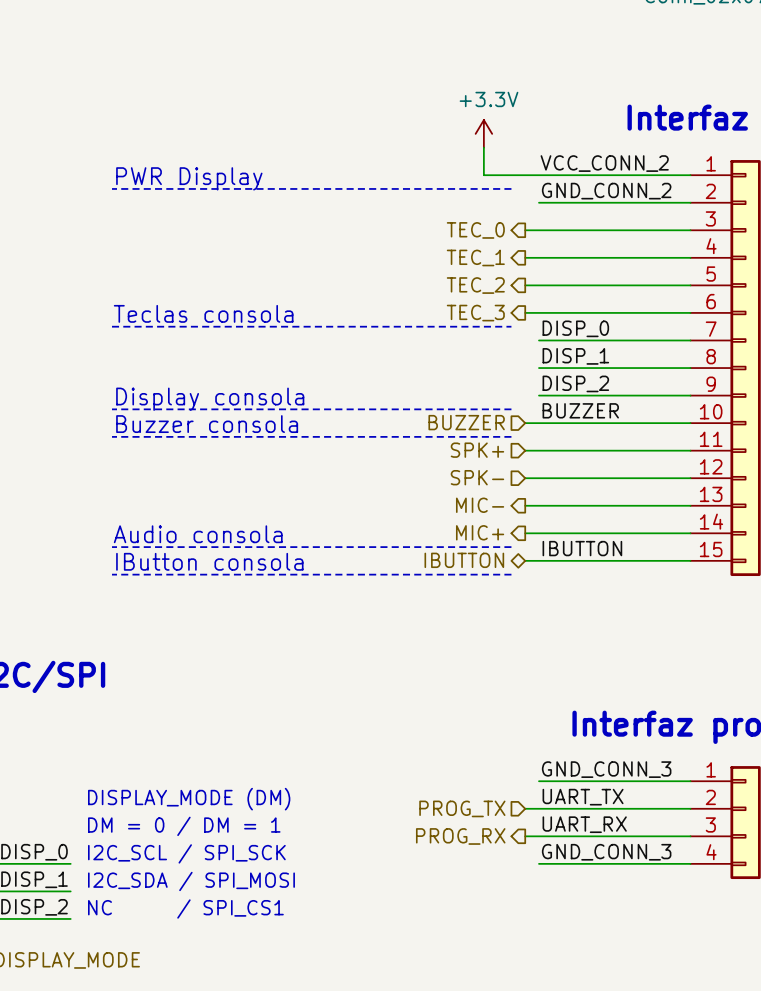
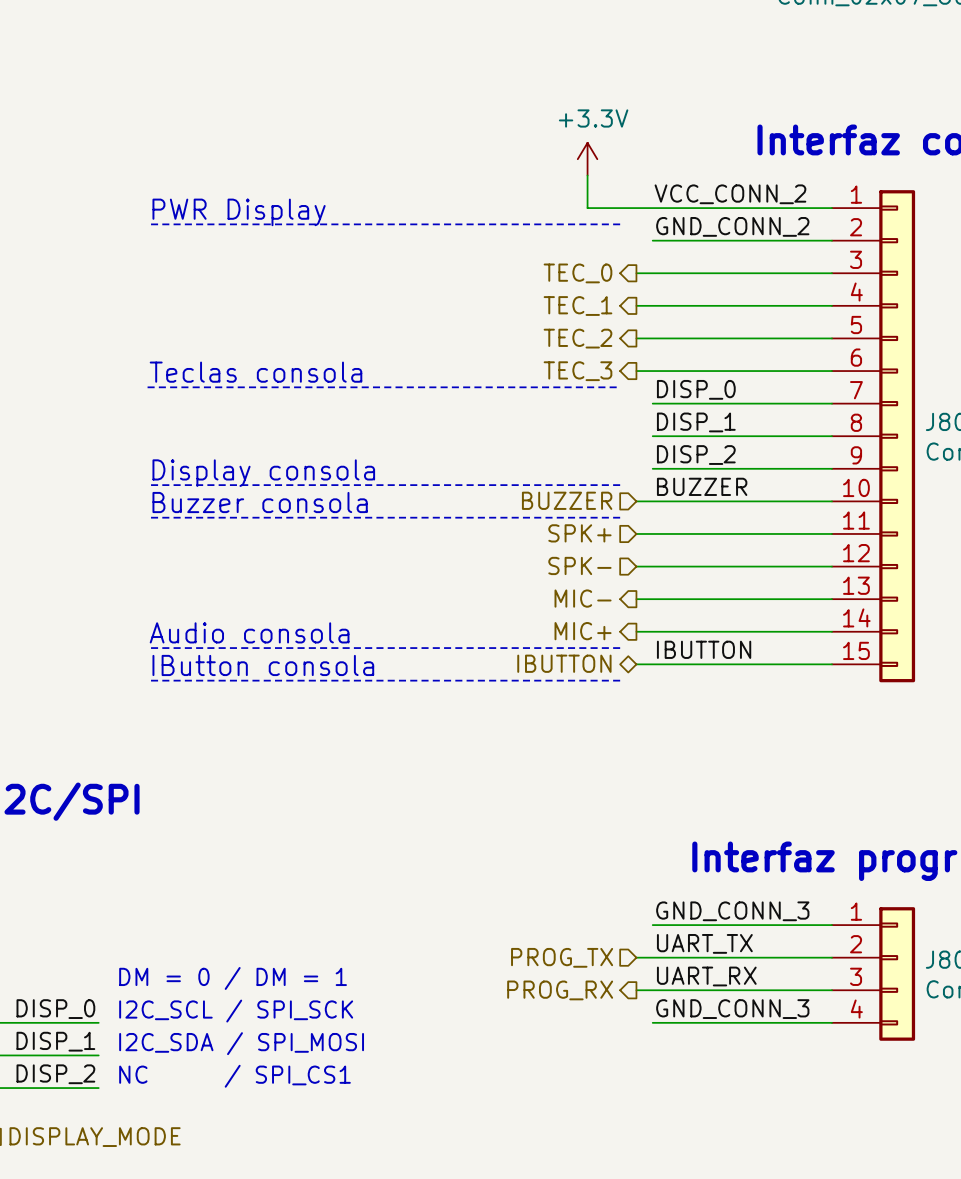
text: DISPLAY_MODE (DM) (189, 799) -> none

